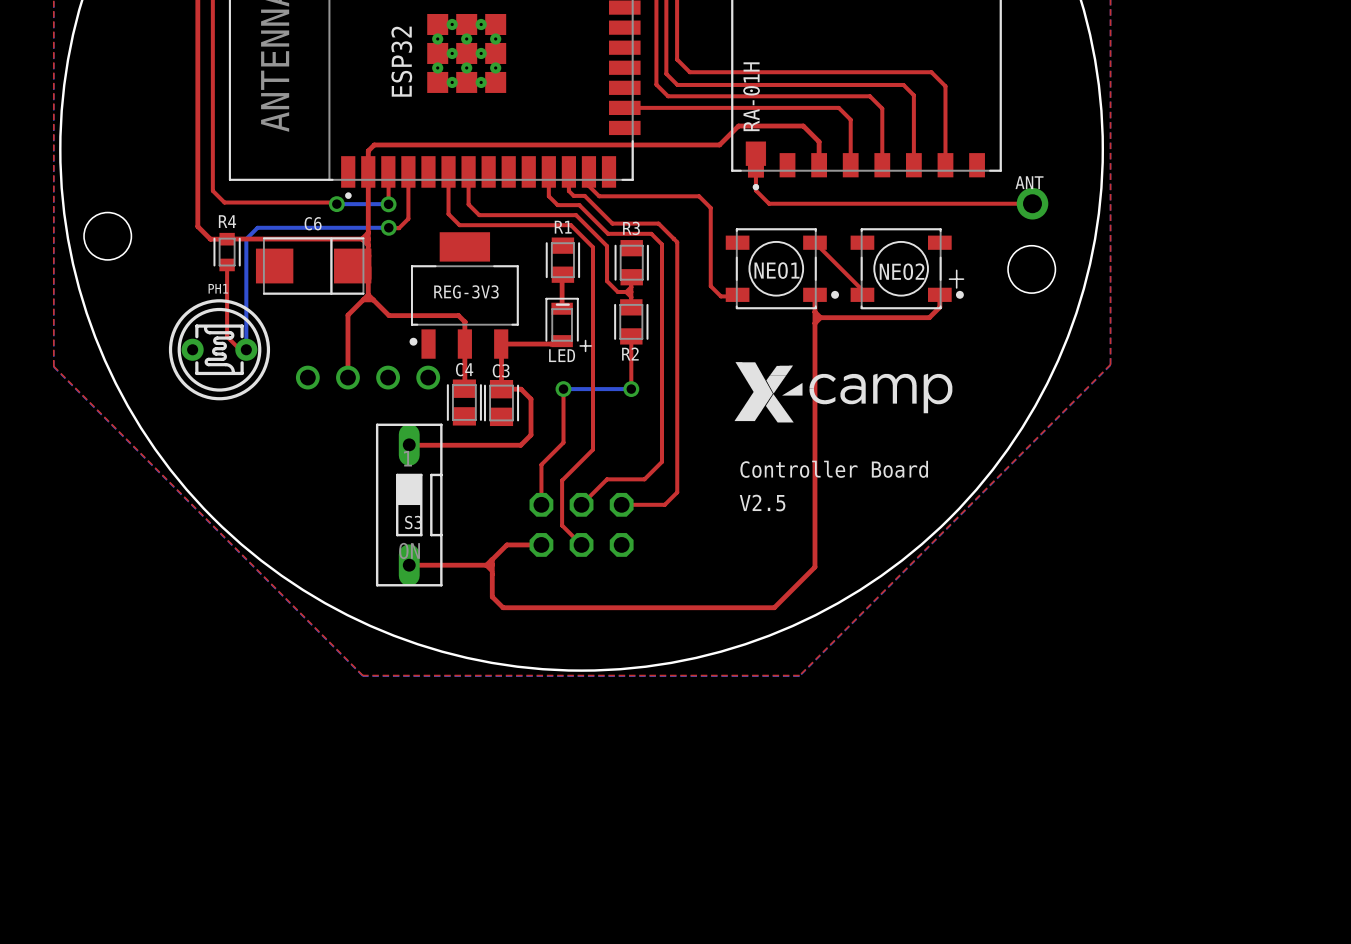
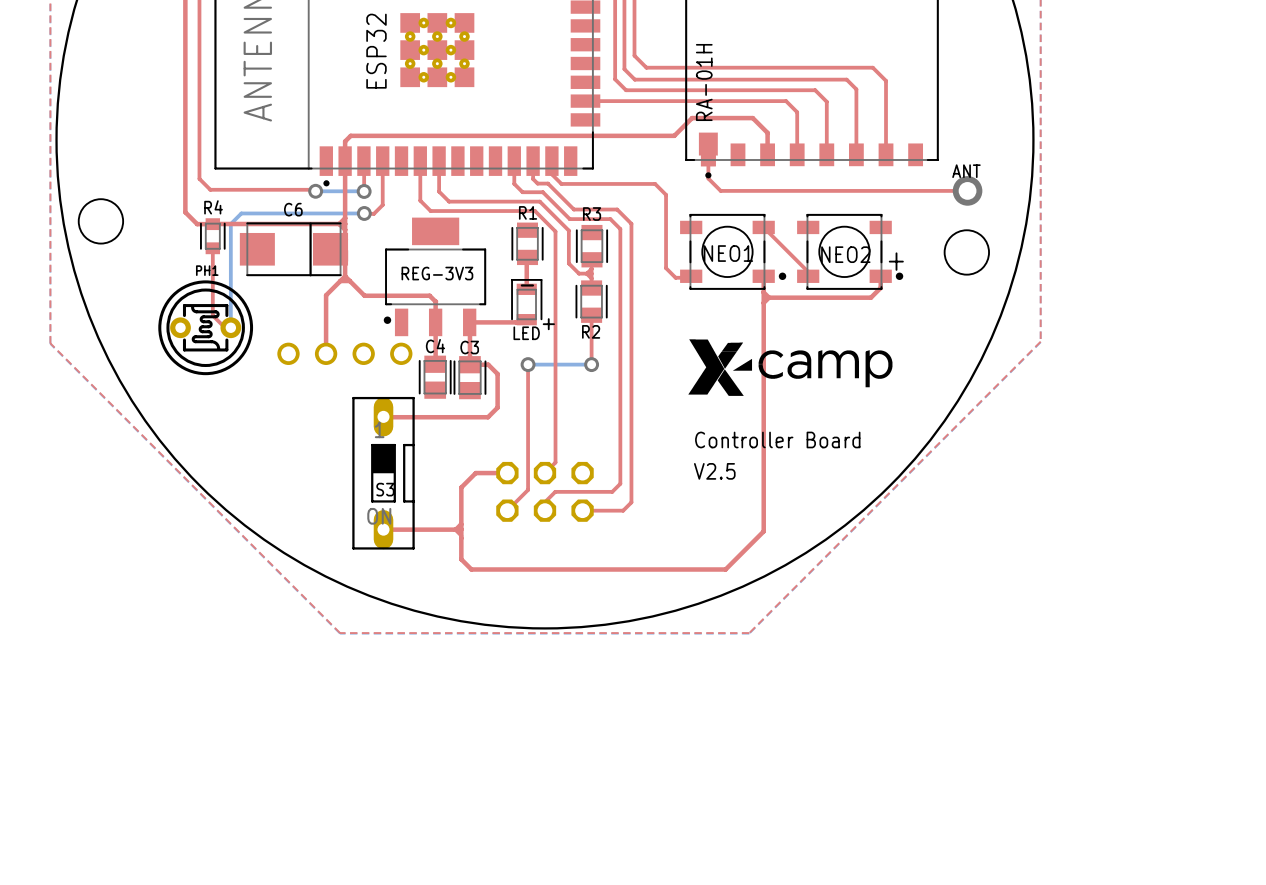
top track: (673, 238) (677, 242) (677, 492) (664, 504) (621, 504) -> (631, 223) (631, 502) (623, 510) (582, 510)
top track: (592, 247) (592, 449) (562, 480) (562, 525) (581, 544) -> (555, 231) (555, 462)
top track: (563, 442) (541, 464) (541, 504) -> (528, 414) (528, 489) (507, 510)
top track: (662, 461) (644, 479) (607, 479) (592, 493) -> (620, 432) (620, 483) (612, 491) (555, 491) (544, 502) (544, 510)
top track: (541, 544) (506, 544) (492, 559) -> (507, 473) (475, 473) (461, 487) (461, 524)

